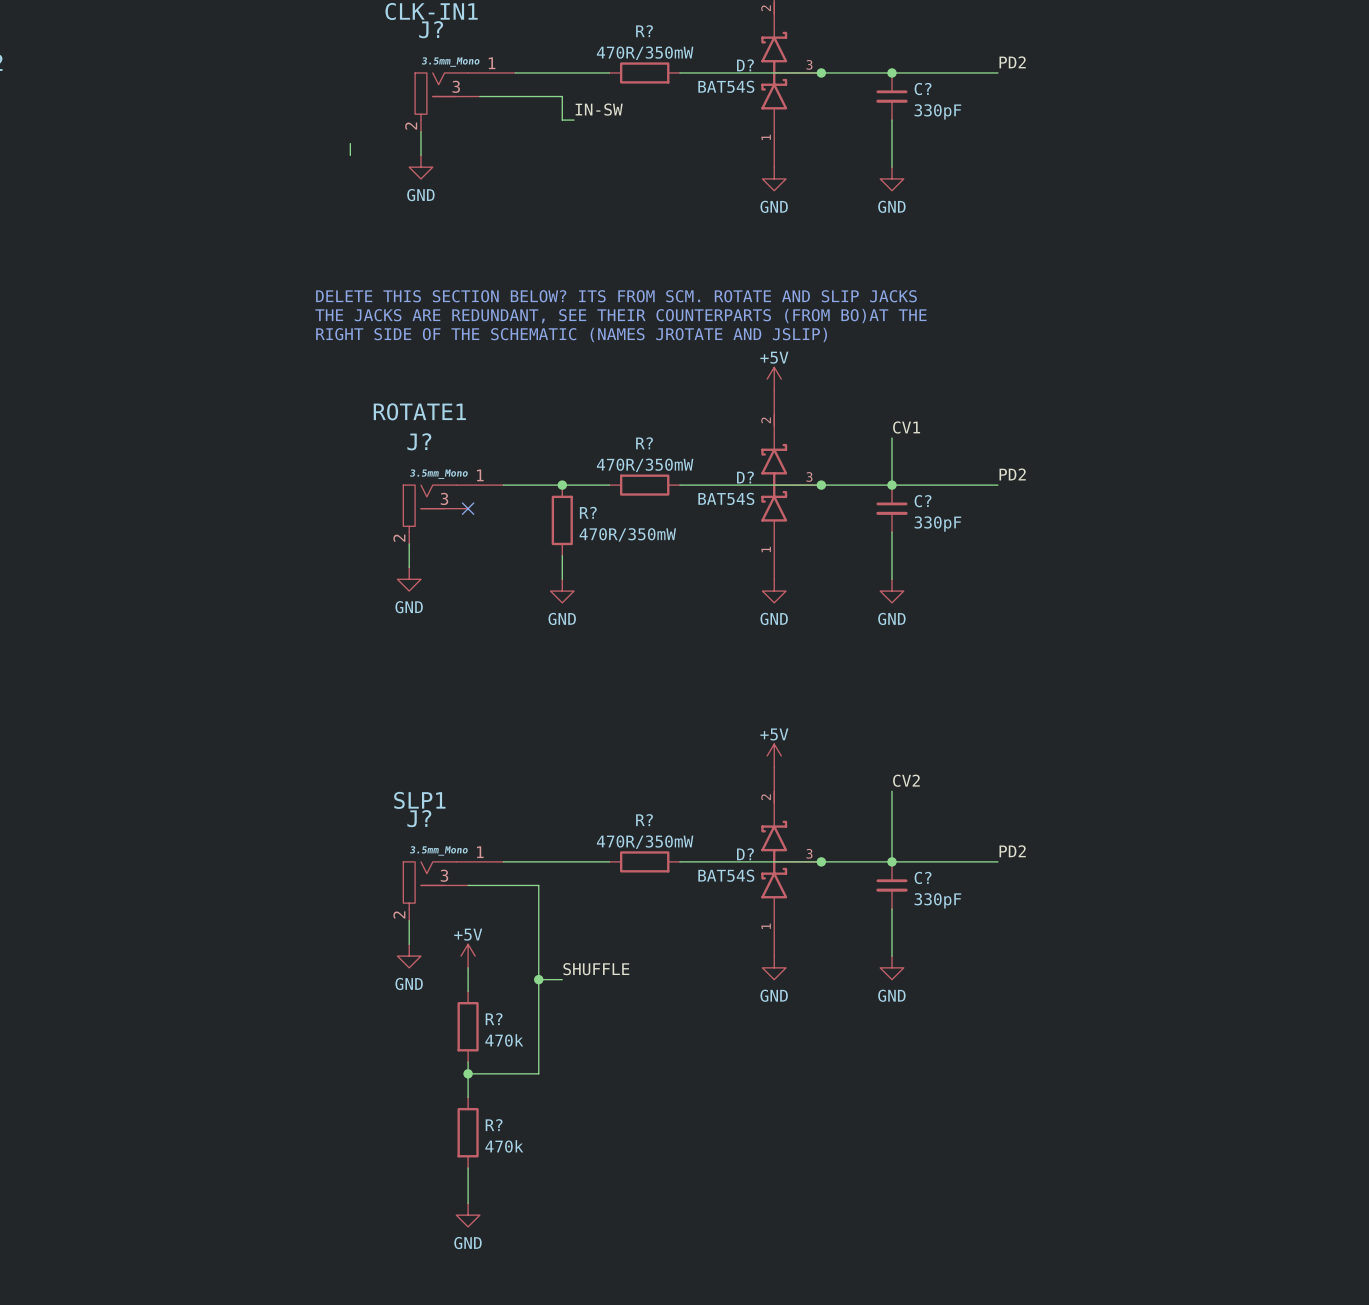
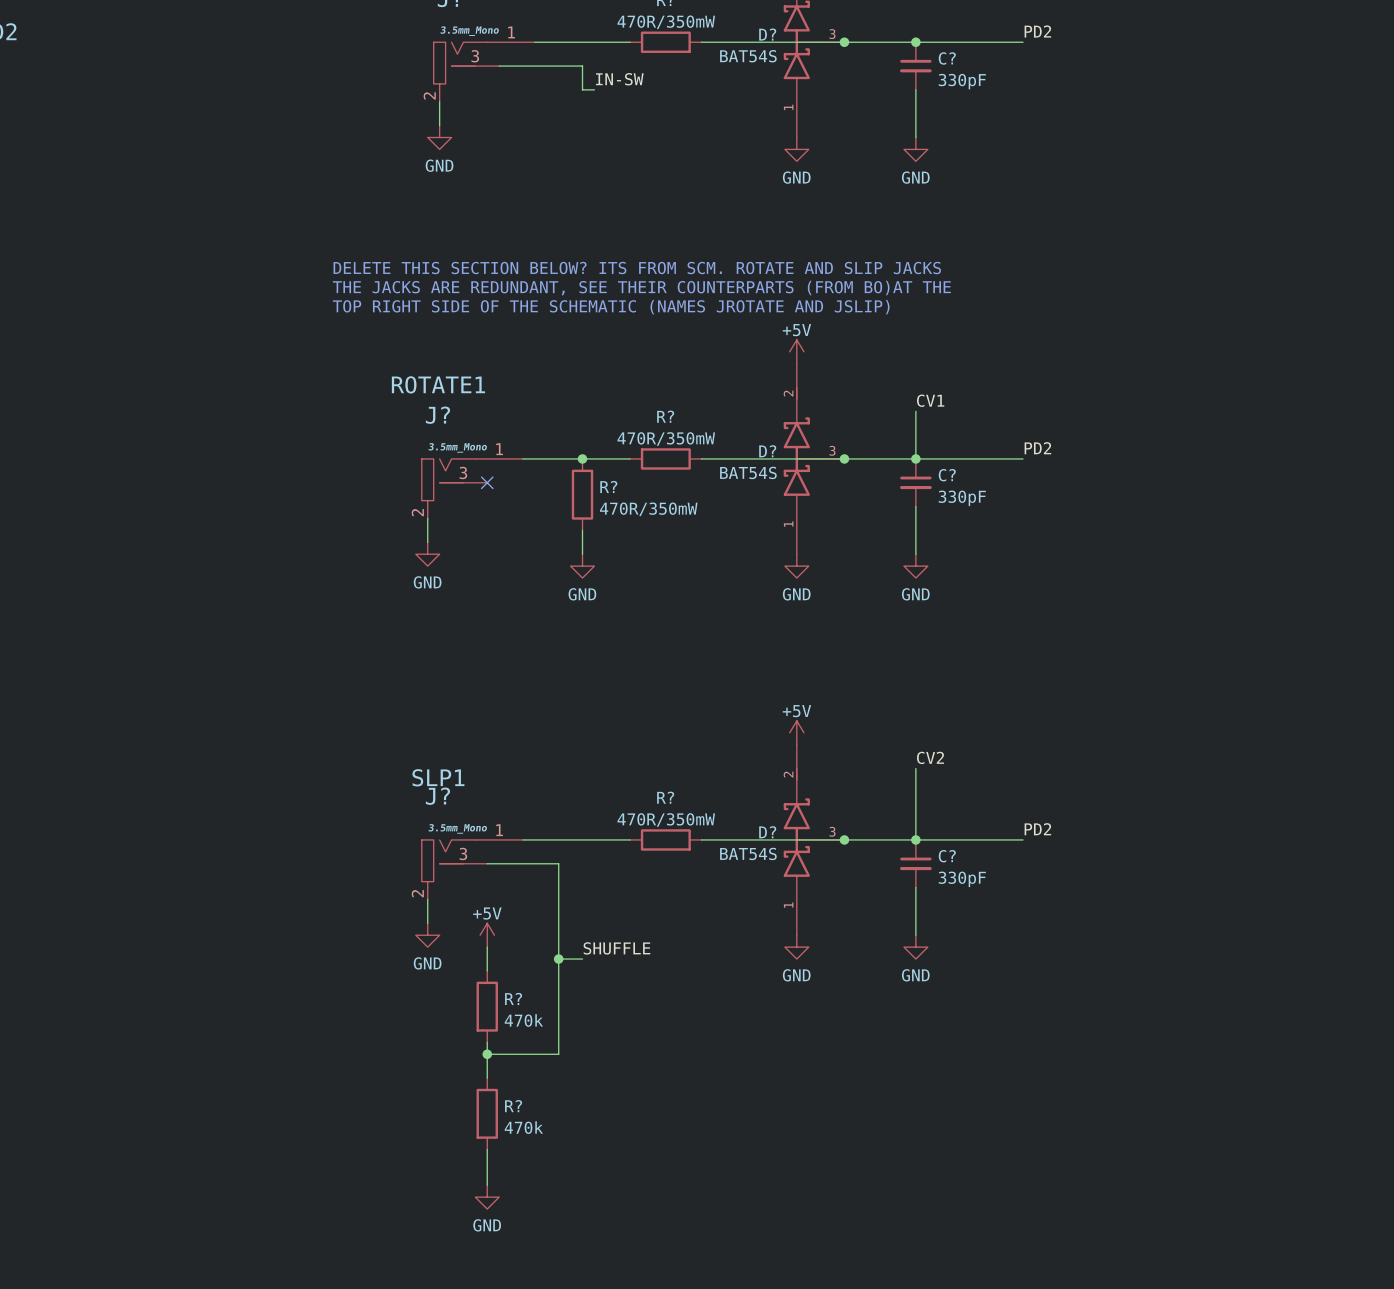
wire: (350, 143) (350, 155) -> none
text: RIGHT SIDE OF THE SCHEMATIC (NAMES JROTATE AND JSLIP) (571, 334) -> TOP RIGHT SIDE OF THE SCHEMATIC (NAMES JROTATE AND JSLIP) (611, 307)

